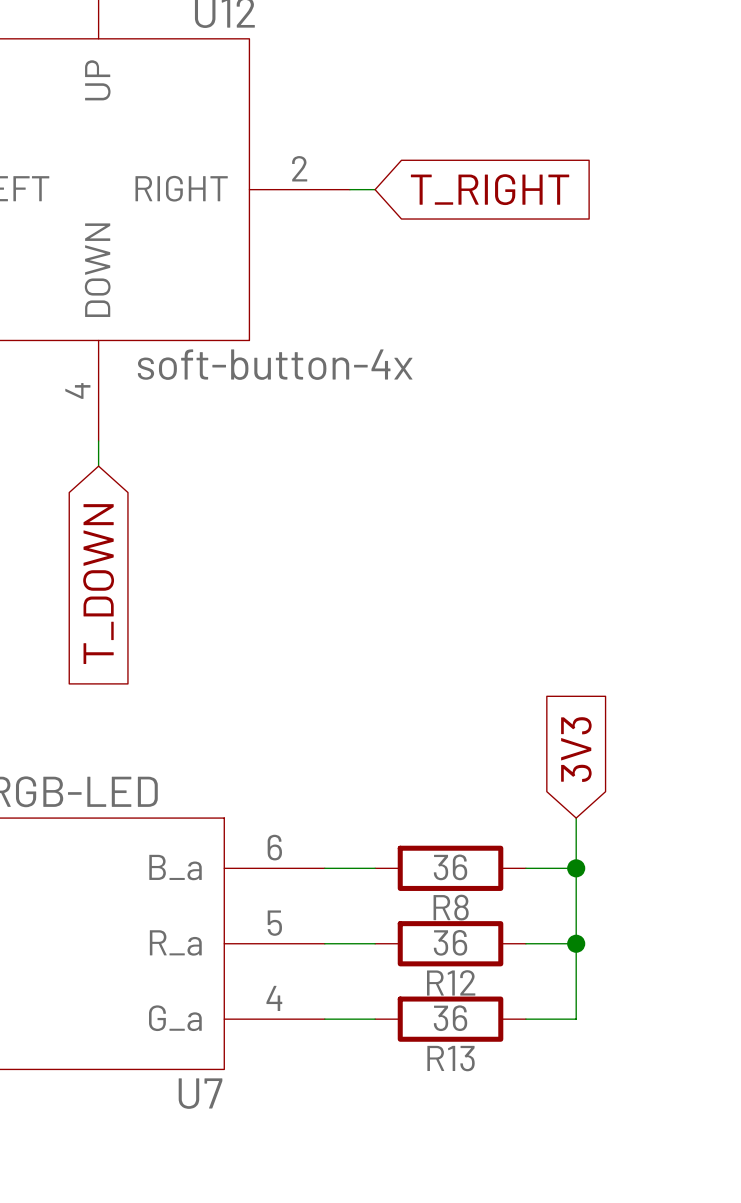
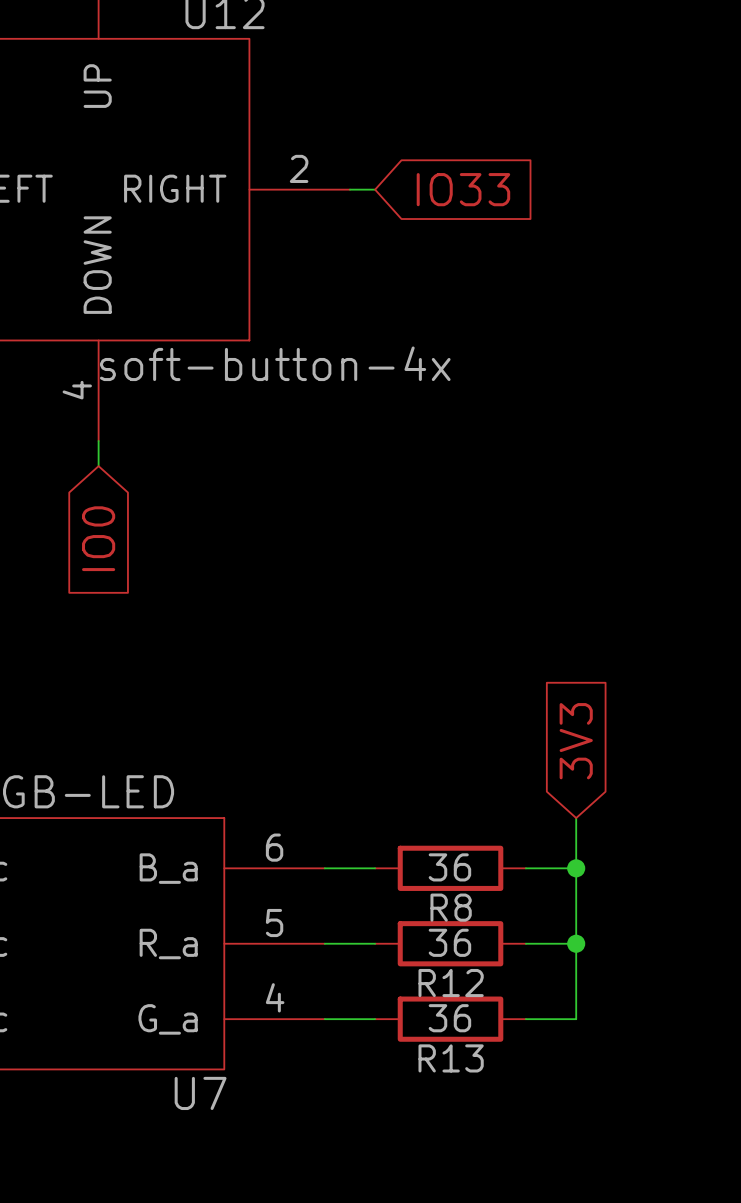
global label: T_RIGHT (490, 189) -> IO33 (463, 189)
global label: T_DOWN (98, 584) -> IO0 (98, 538)

